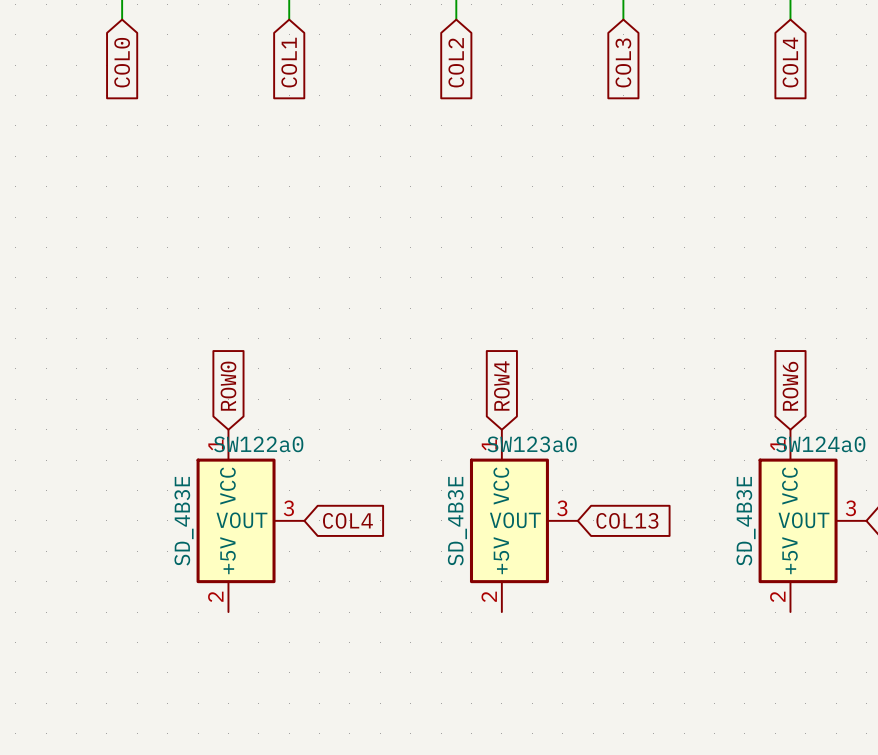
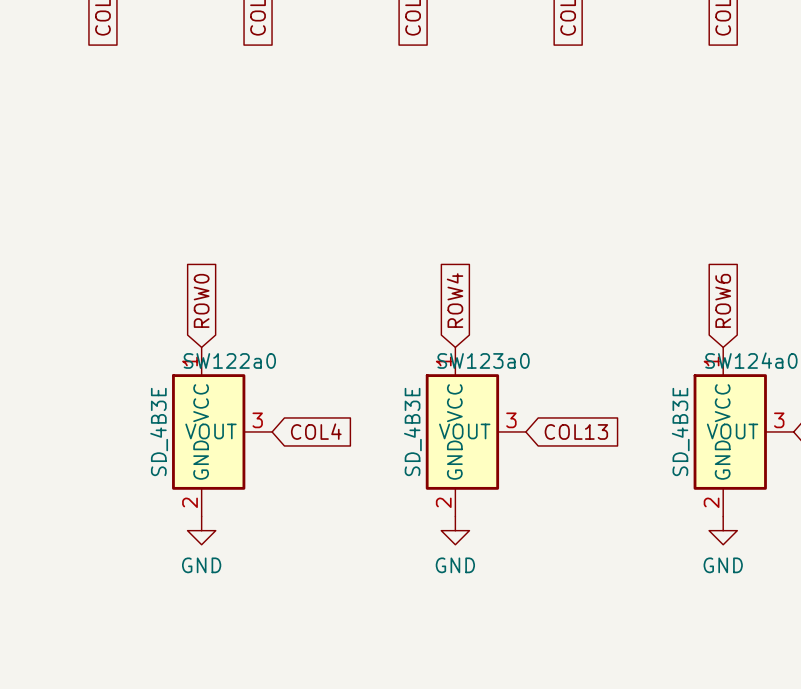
SW122a0 pin name: +5V (228, 555) -> GND (201, 460)
SW123a0 pin name: +5V (501, 555) -> GND (454, 460)
SW124a0 pin name: +5V (790, 555) -> GND (722, 460)
power symbol: none -> GND (201, 530)
power symbol: none -> GND (455, 530)
power symbol: none -> GND (723, 530)

